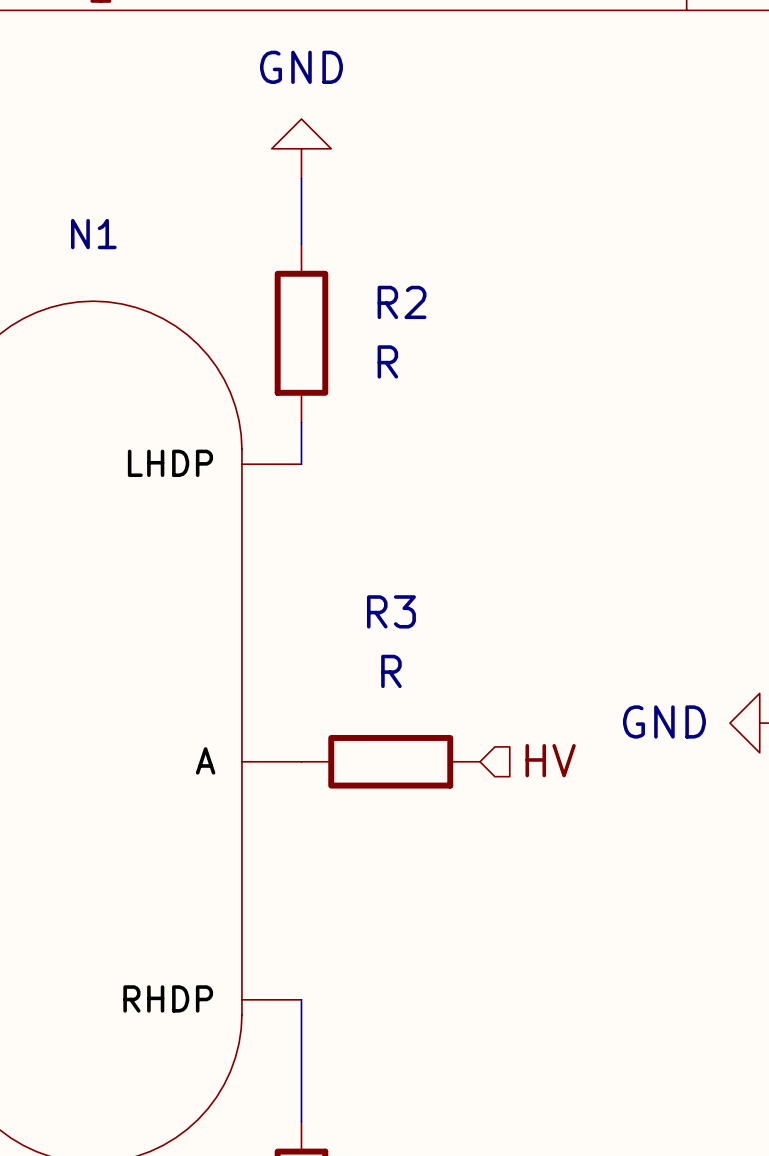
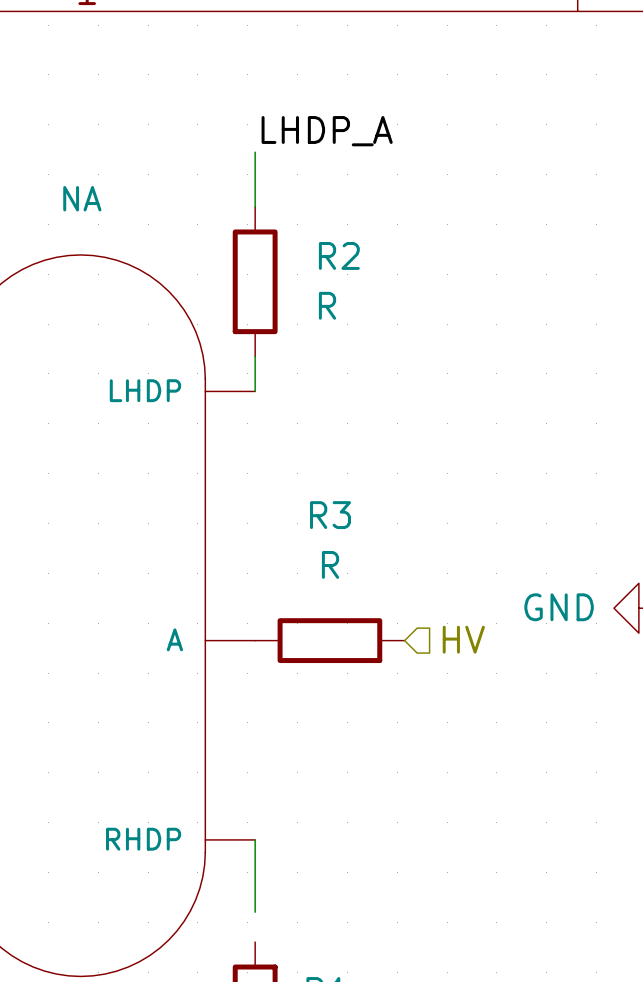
power symbol: GND (301, 148) -> none
label: none -> LHDP_A (327, 131)
N1 name: N1 (93, 234) -> NA (82, 198)
wire: (301, 1086) (301, 1121) -> none

